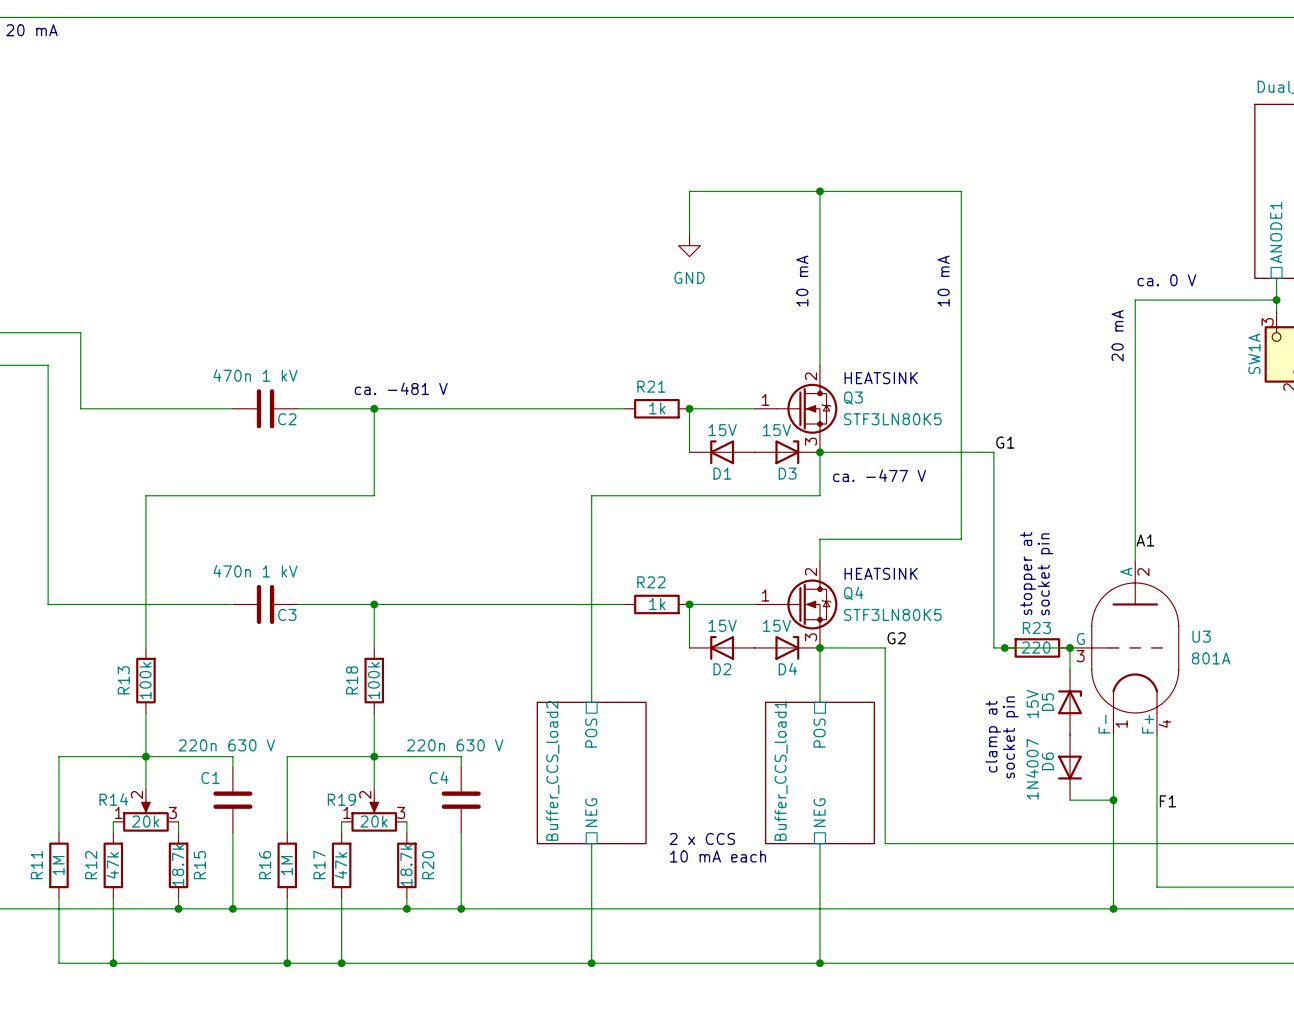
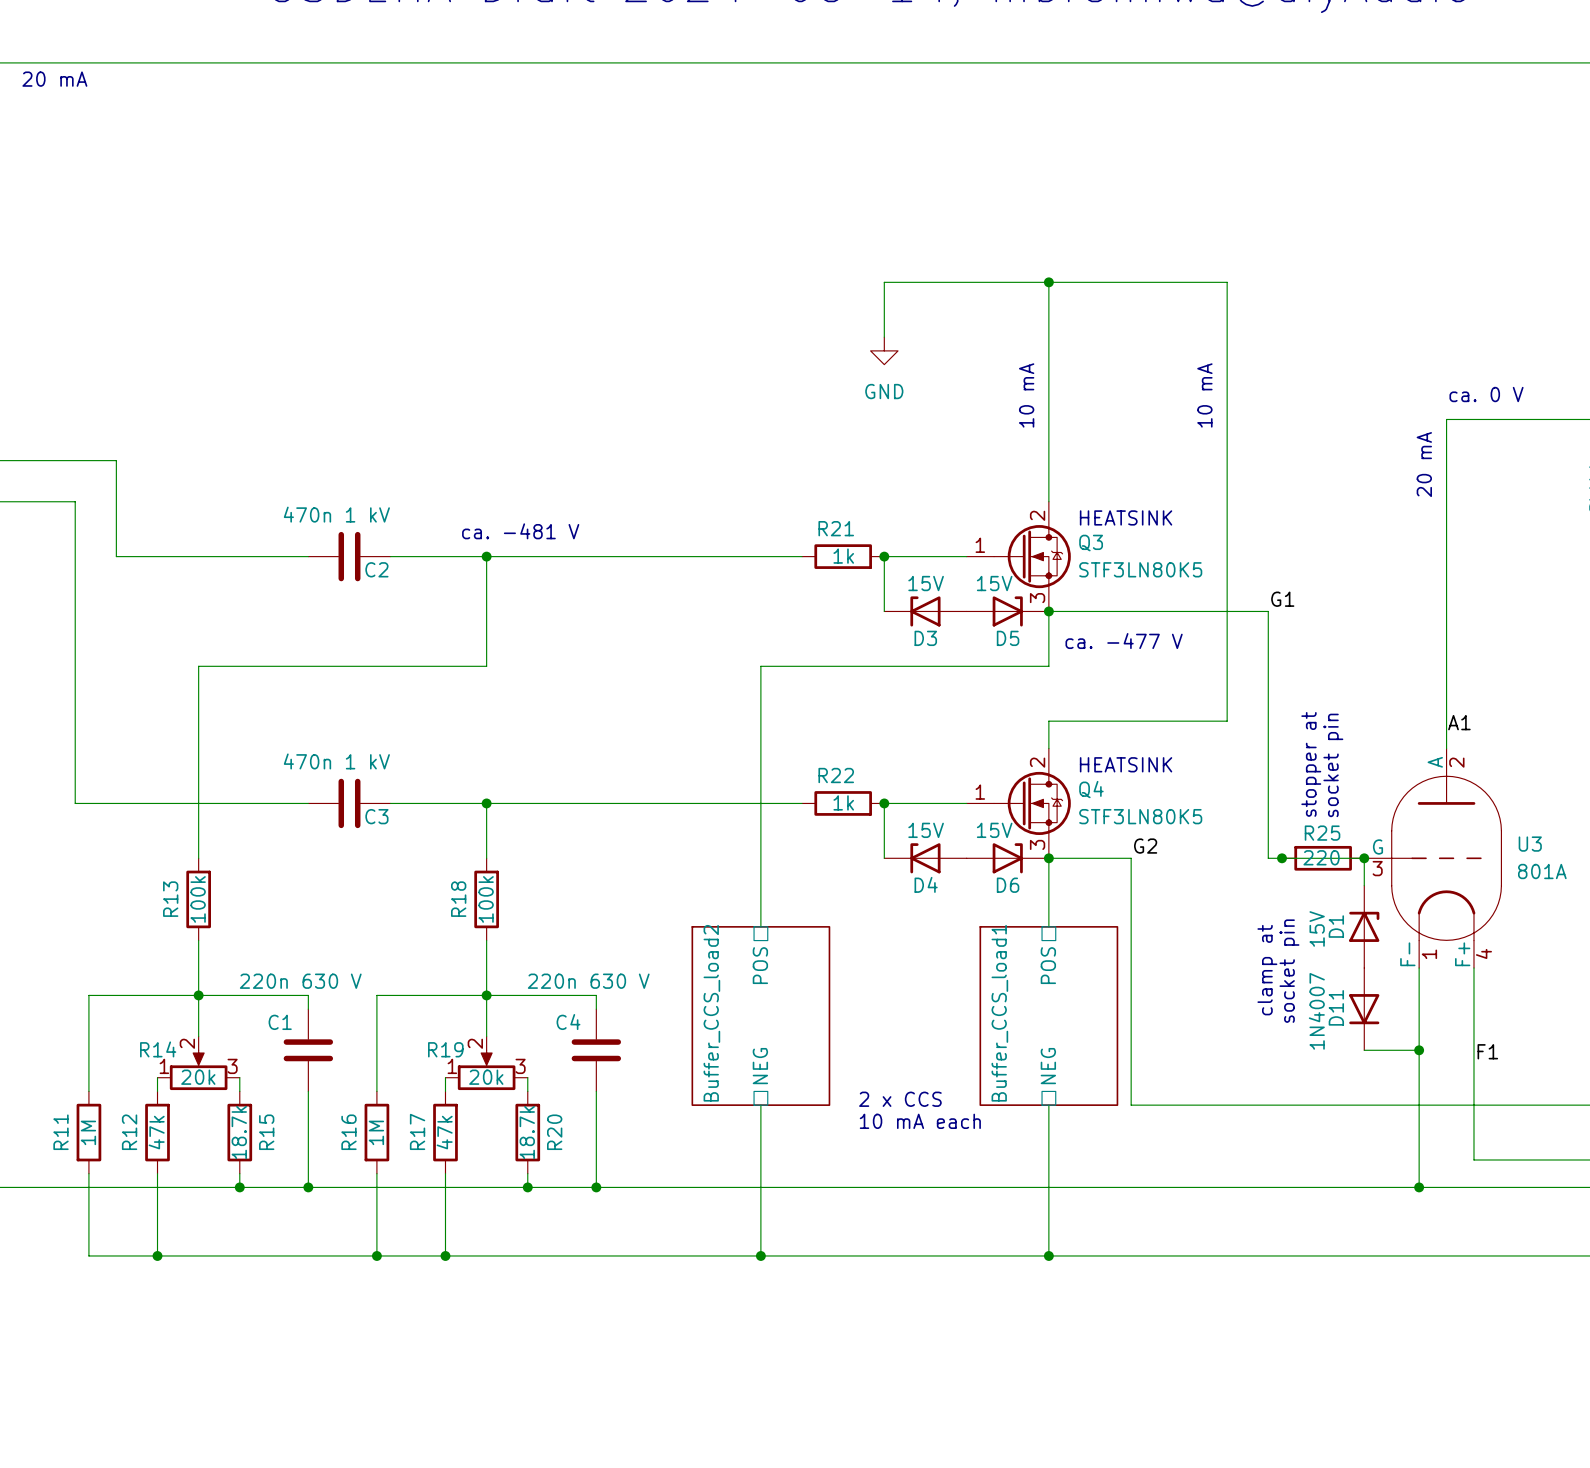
D1 name: D1 (722, 473) -> D3 (925, 638)
D3 name: D3 (787, 473) -> D5 (1008, 638)
R23 name: R23 (1036, 627) -> R25 (1322, 833)
D2 name: D2 (722, 669) -> D4 (926, 884)
D4 name: D4 (787, 669) -> D6 (1008, 885)
D5 name: D5 (1047, 702) -> D1 (1336, 926)
D6 name: D6 (1047, 761) -> D11 (1336, 1007)

